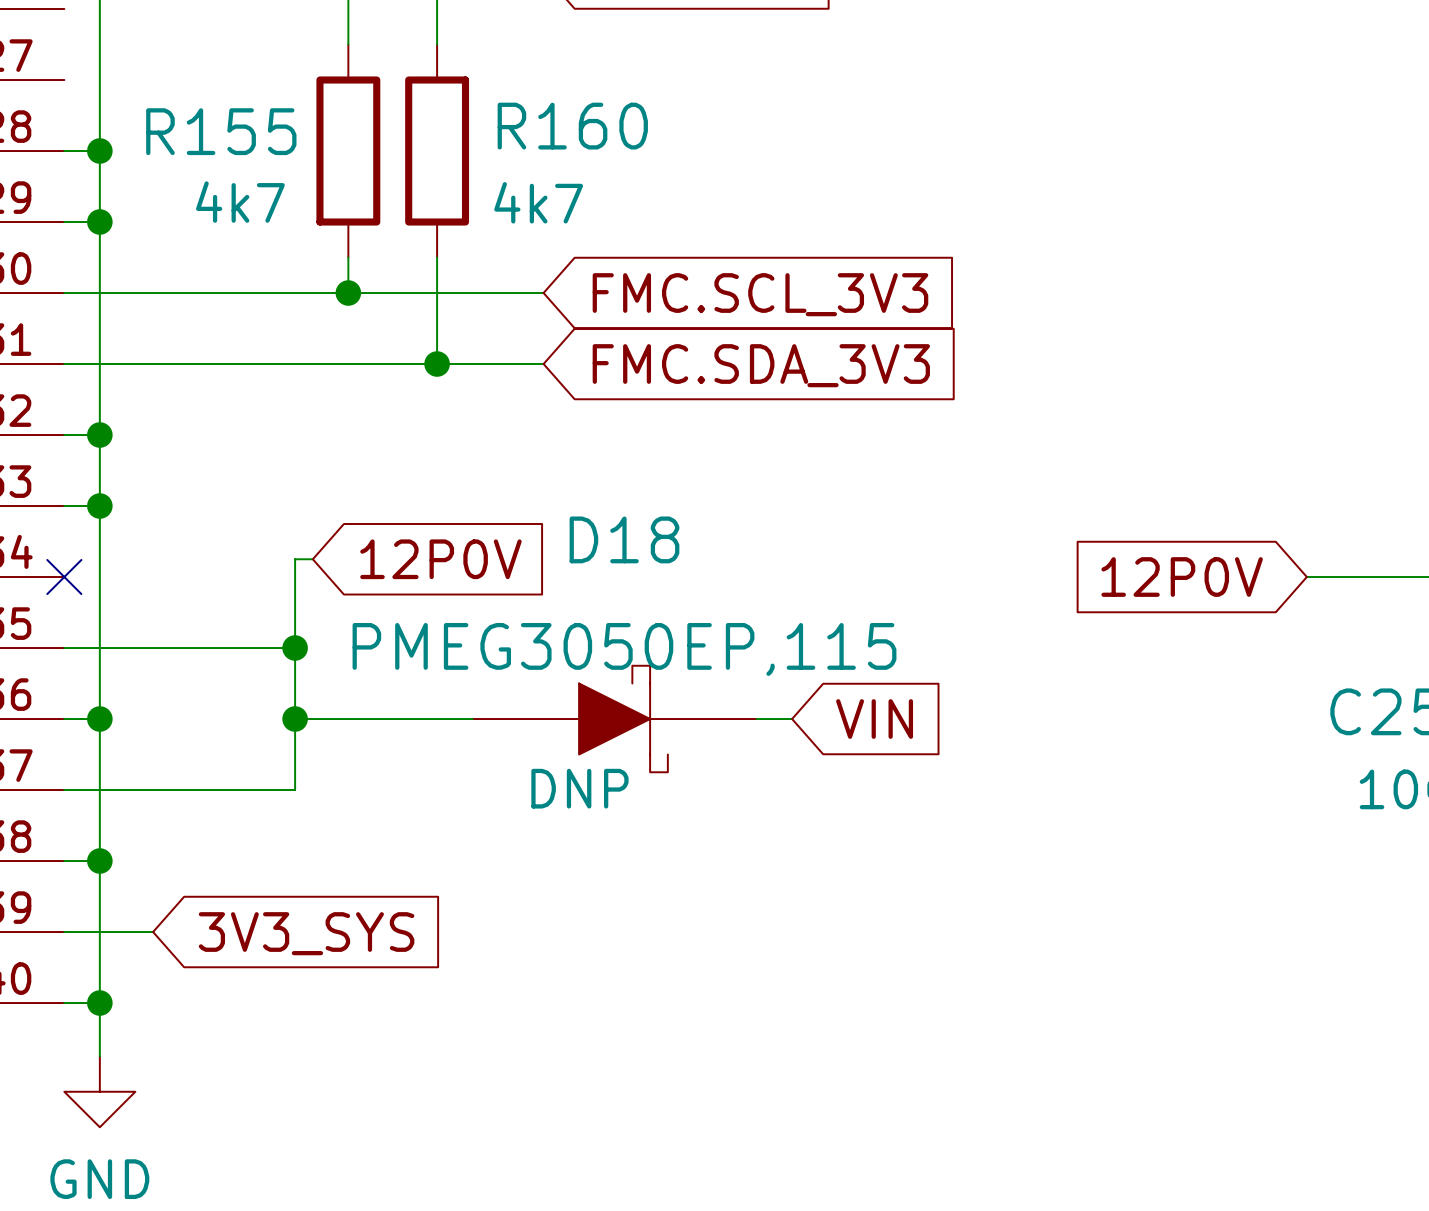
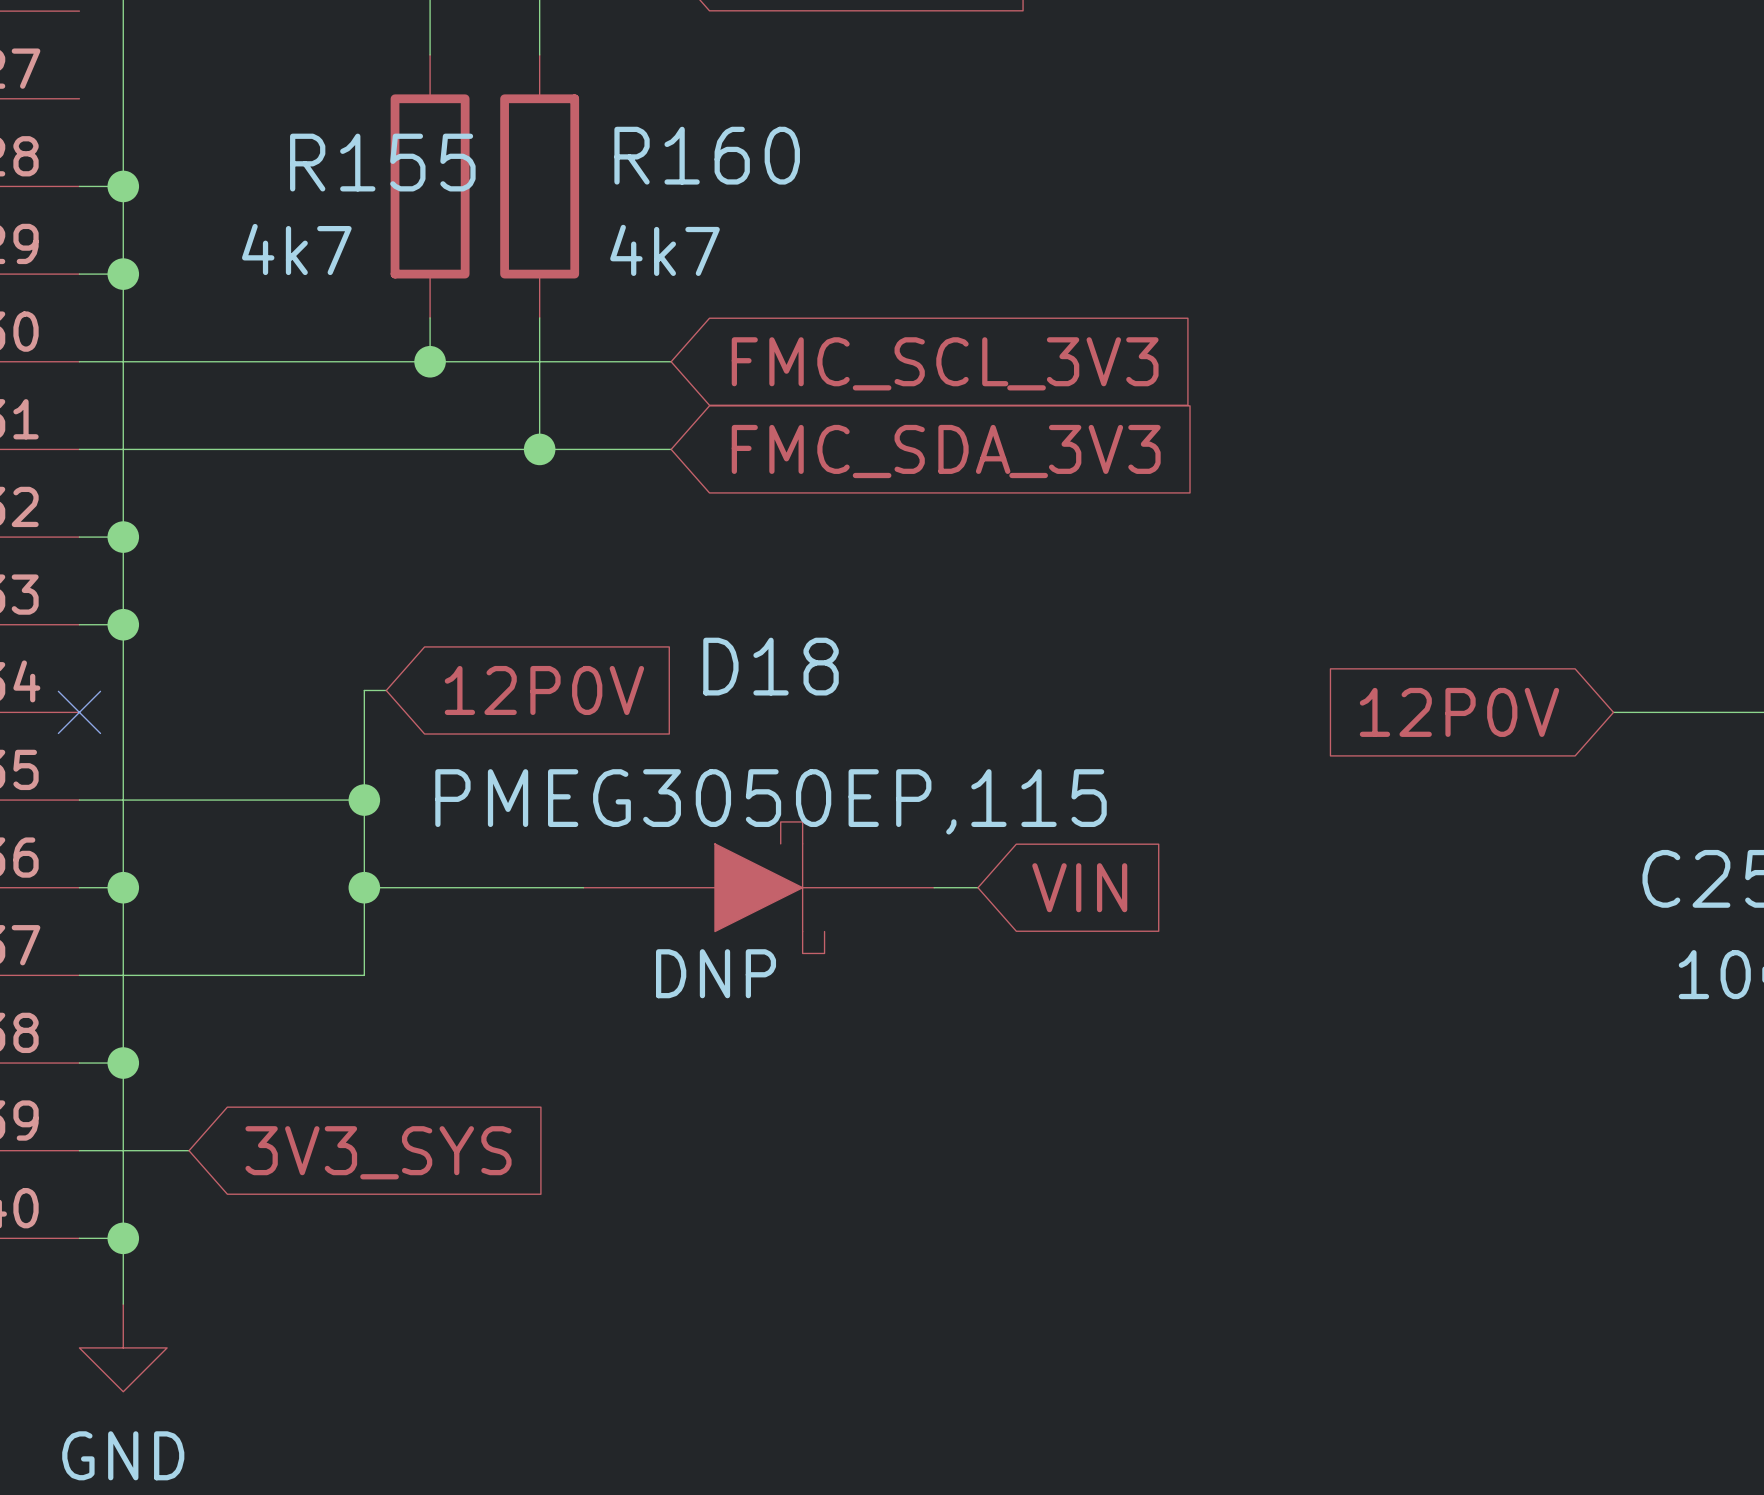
R155 name position: R155 (221, 131) -> R155 (382, 162)
global label: FMC.SCL_3V3 (760, 294) -> FMC_SCL_3V3 (945, 363)
global label: FMC.SDA_3V3 (761, 365) -> FMC_SDA_3V3 (946, 451)

